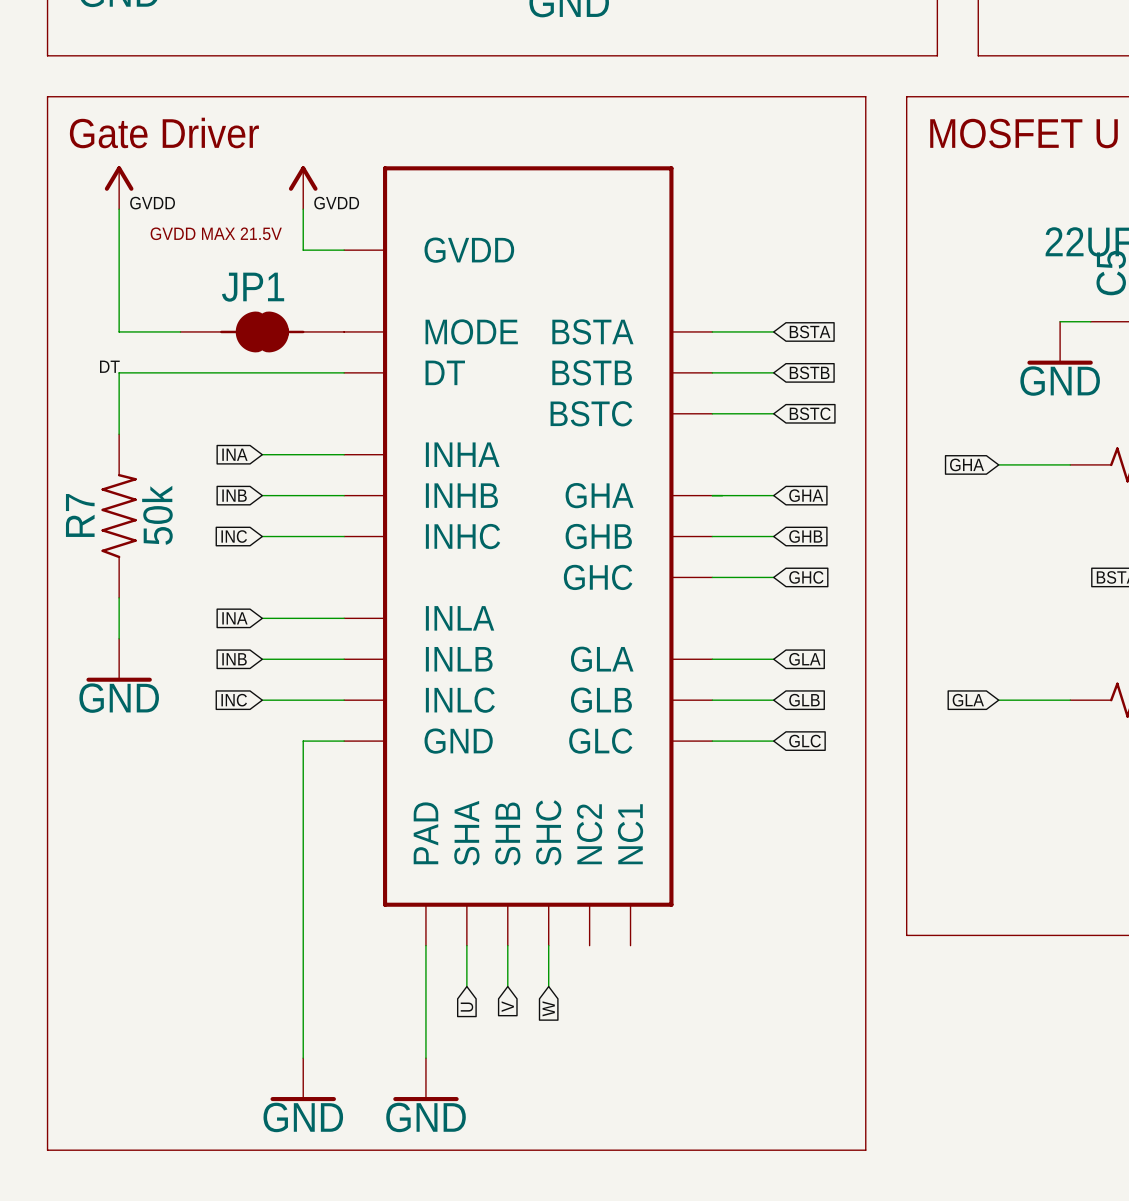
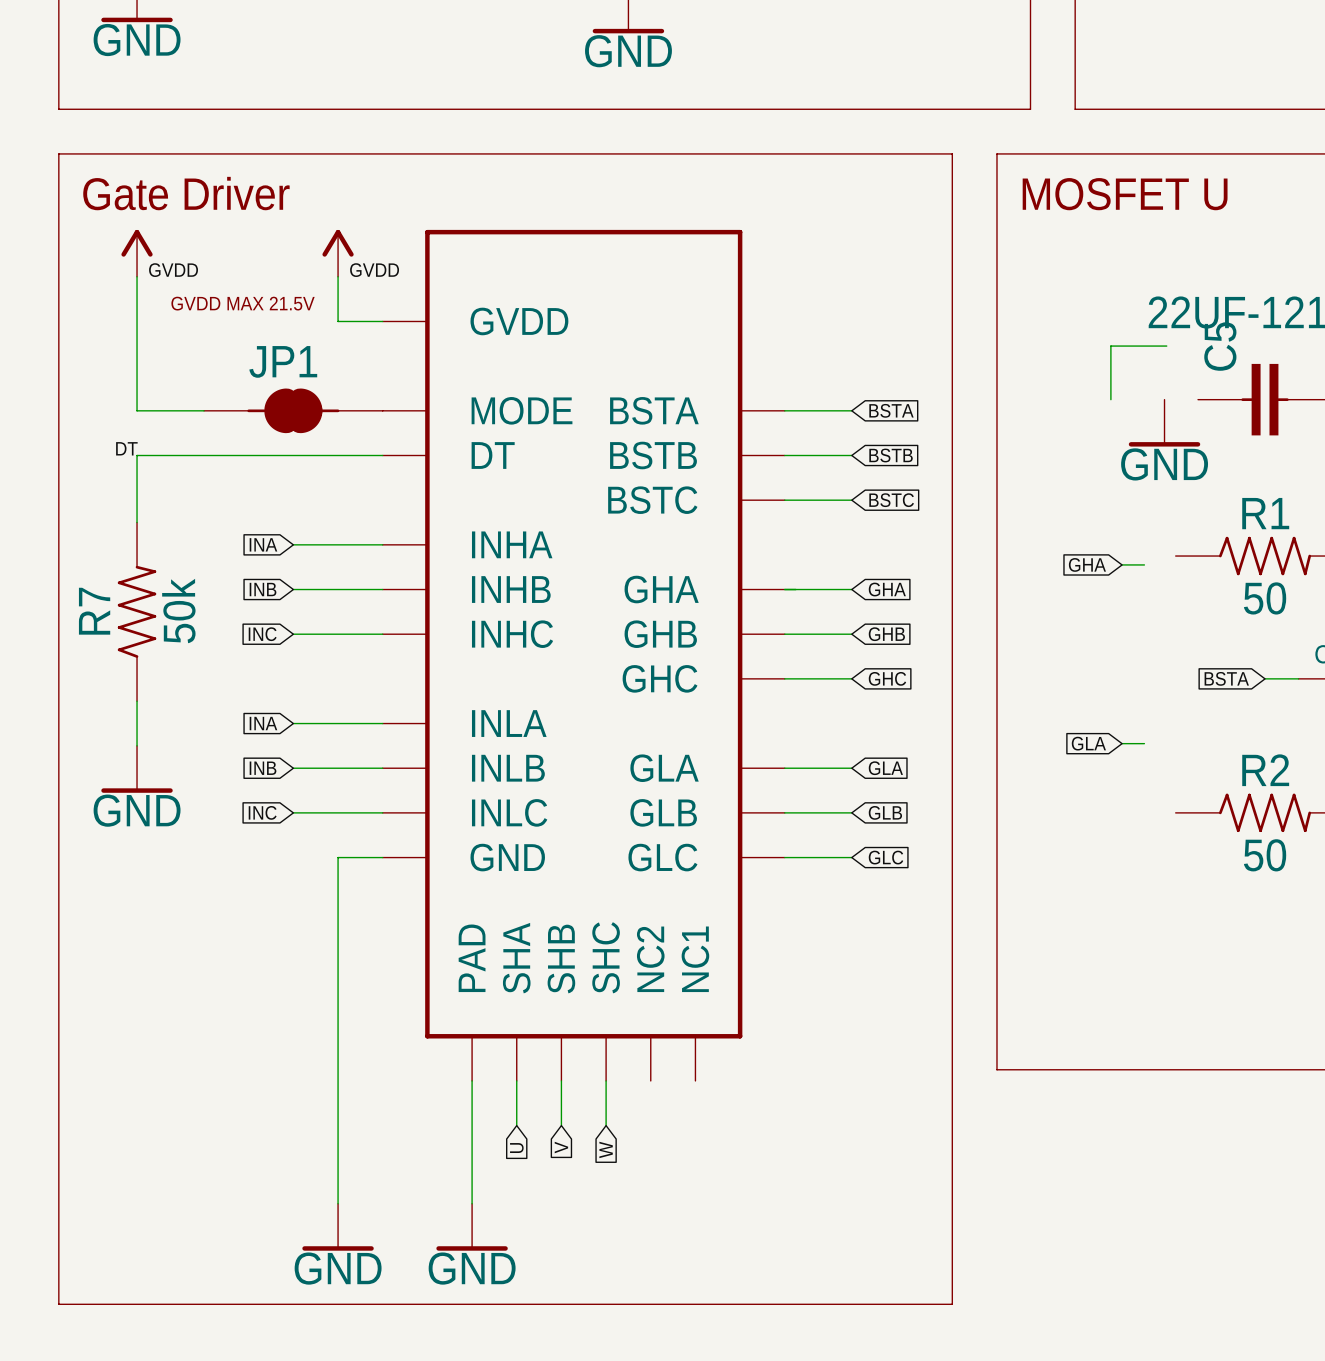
wire: none -> (1166, 346) (1110, 346) (1110, 399)
wire: (1060, 321) (1090, 321) -> none
global label position: GHA (966, 464) -> GHA (1087, 564)
wire: (998, 464) (1070, 464) -> none
wire: none -> (1122, 564) (1144, 564)
wire: none -> (1122, 743) (1144, 743)
global label position: GLA (968, 700) -> GLA (1088, 743)
wire: (998, 700) (1070, 700) -> none

